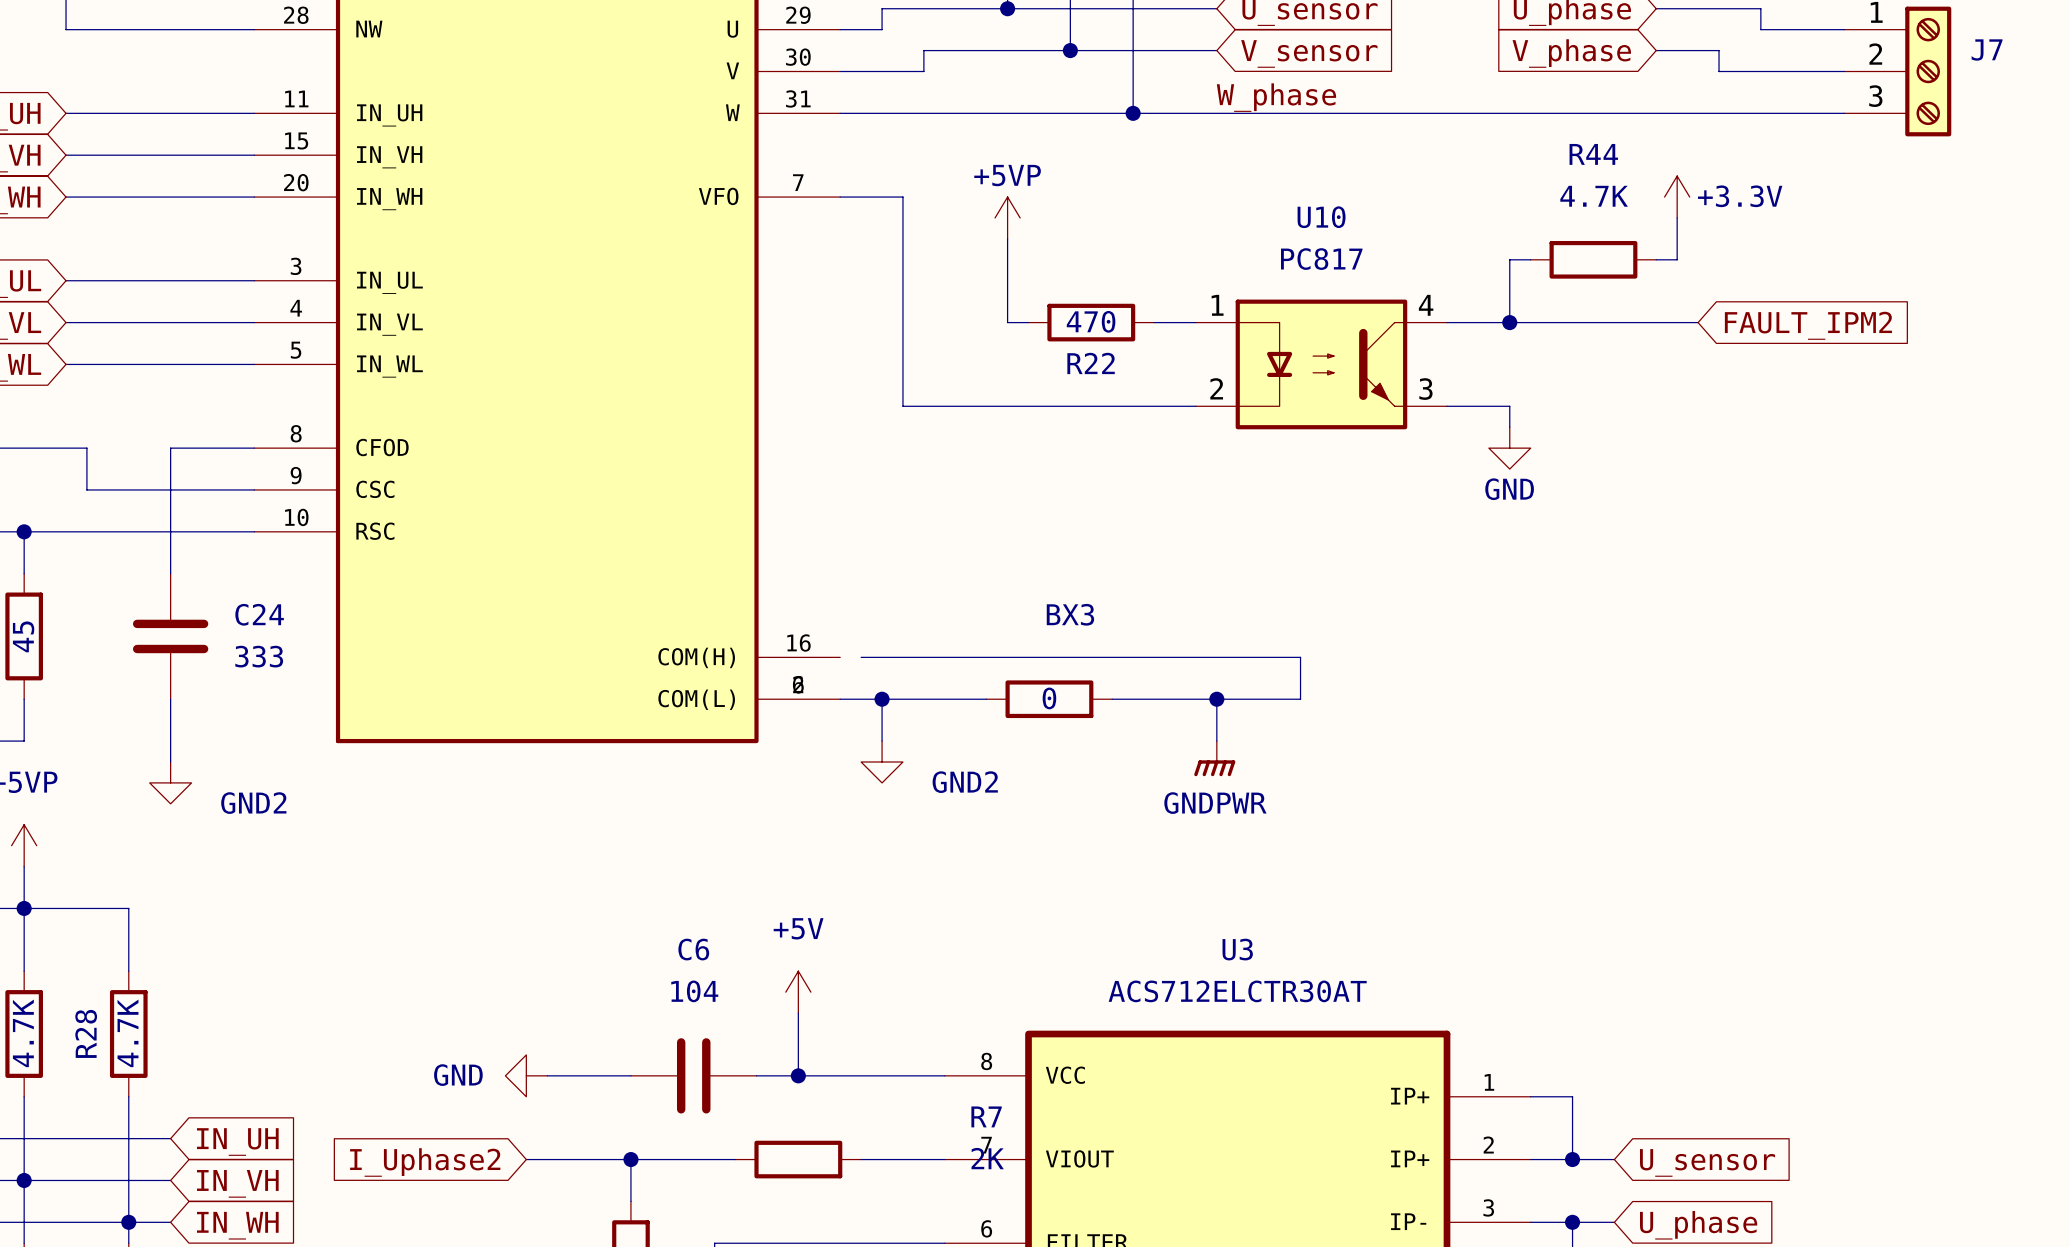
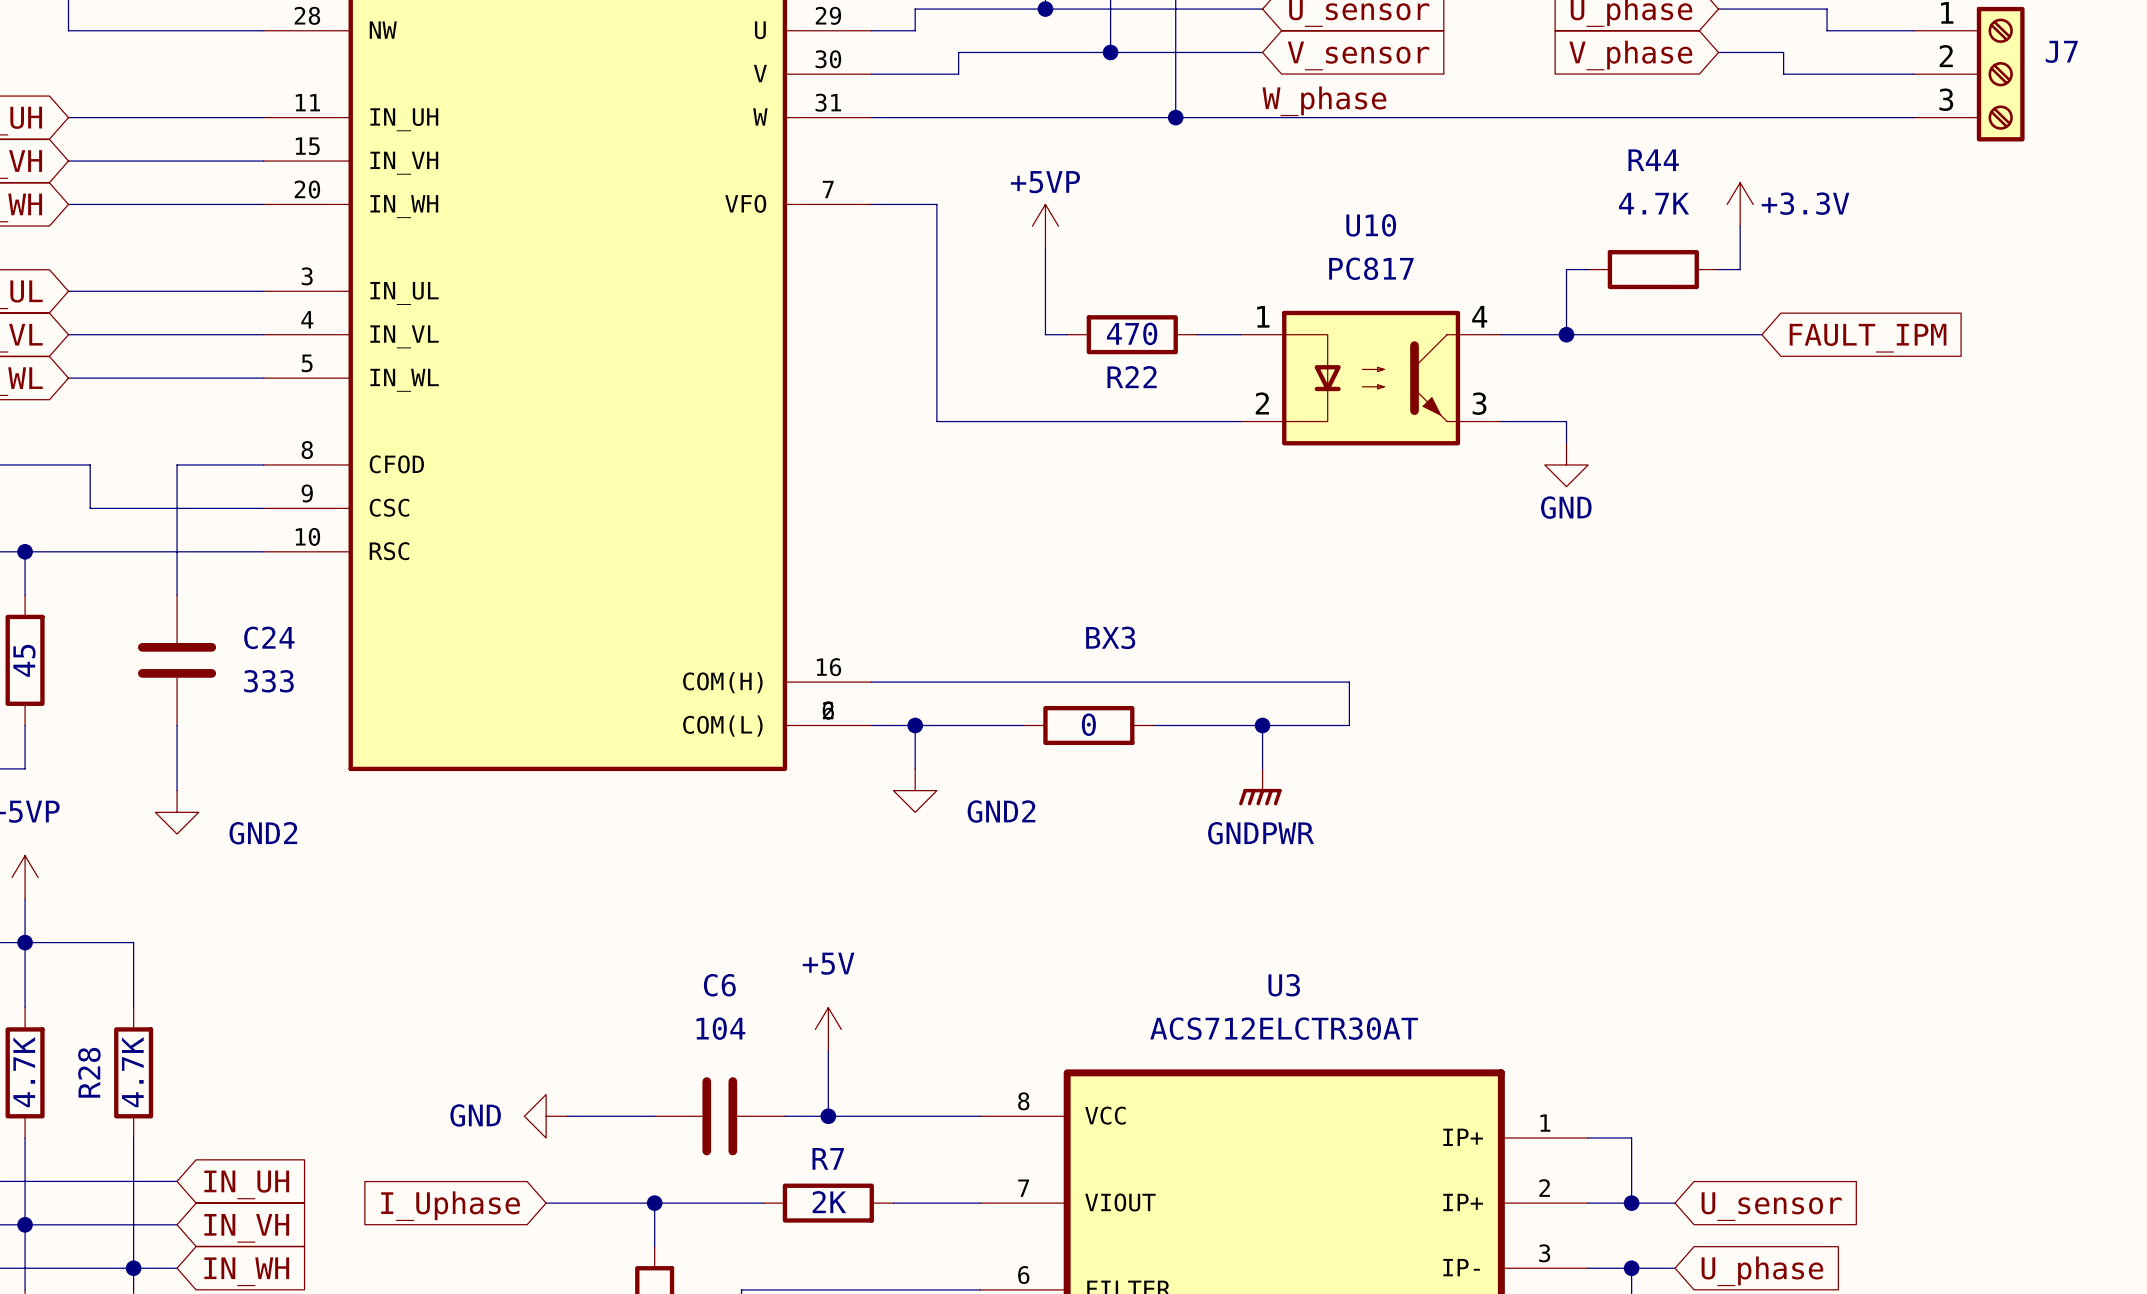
global label: FAULT_IPM2 (1808, 325) -> FAULT_IPM (1868, 338)
wire: none -> (871, 682) (893, 682)
R7 name position: R7 (986, 1116) -> R7 (828, 1158)
R7 value position: 2K (987, 1158) -> 2K (829, 1202)
global label: I_Uphase2 (425, 1162) -> I_Uphase (450, 1206)

